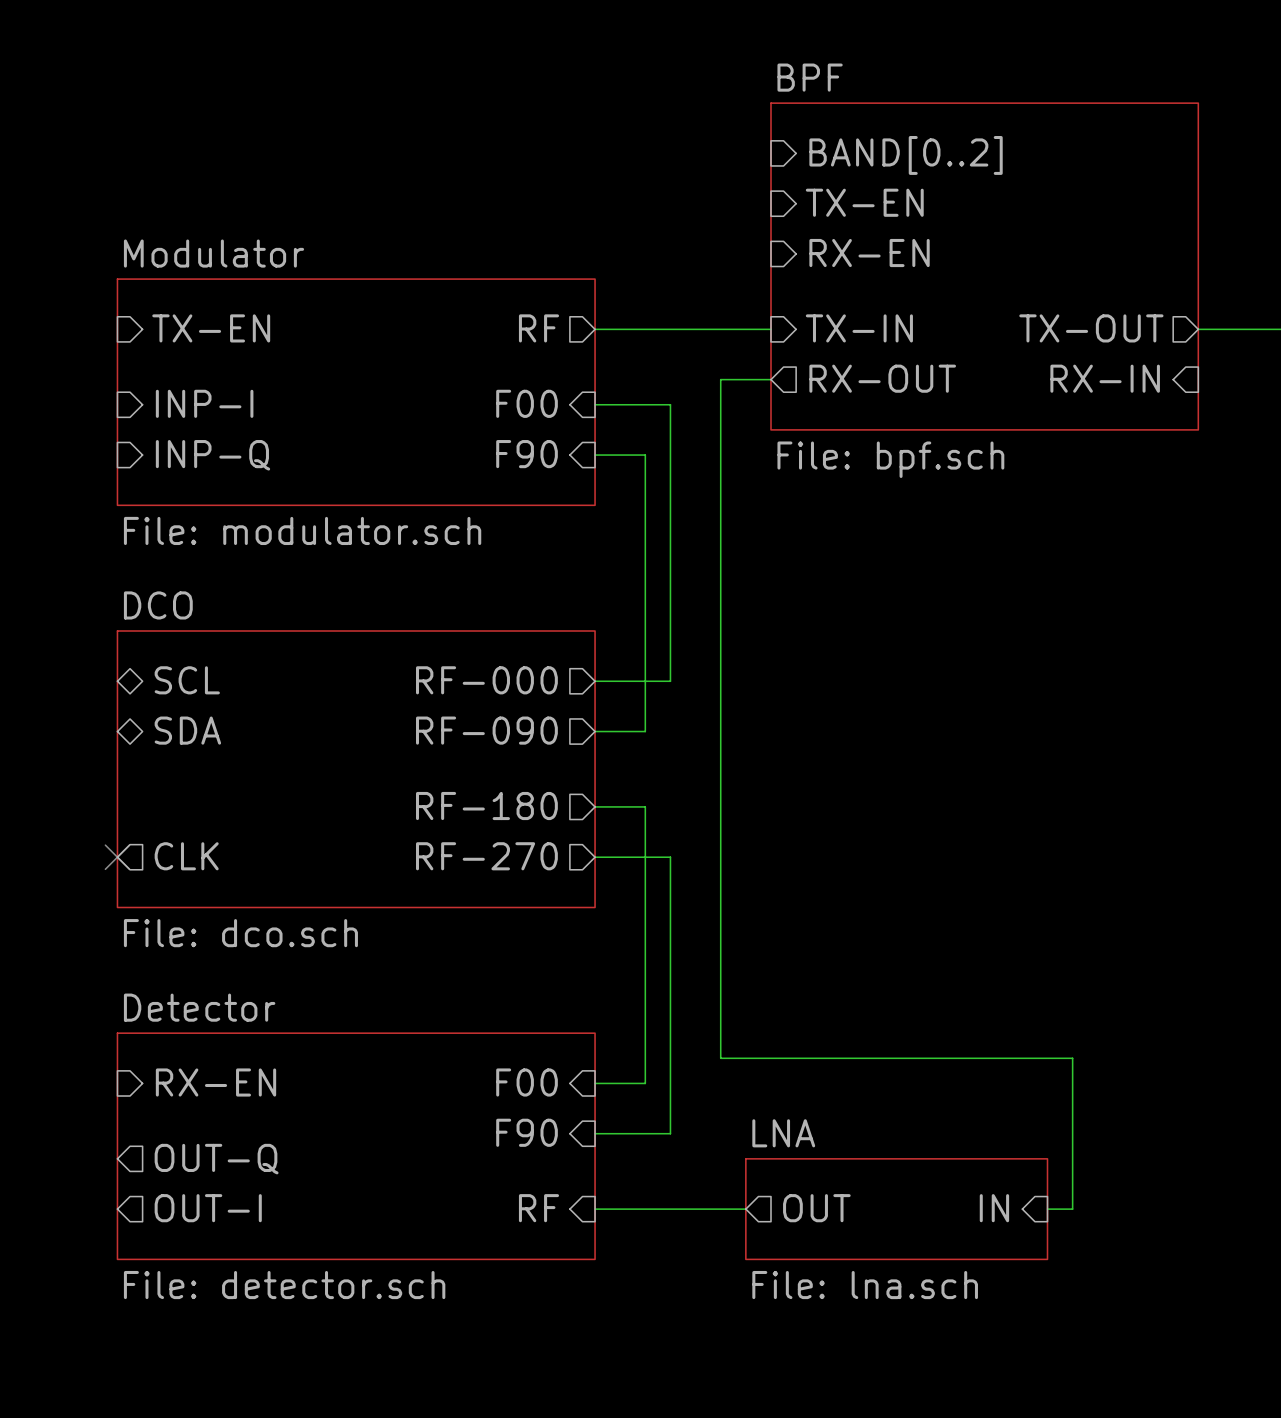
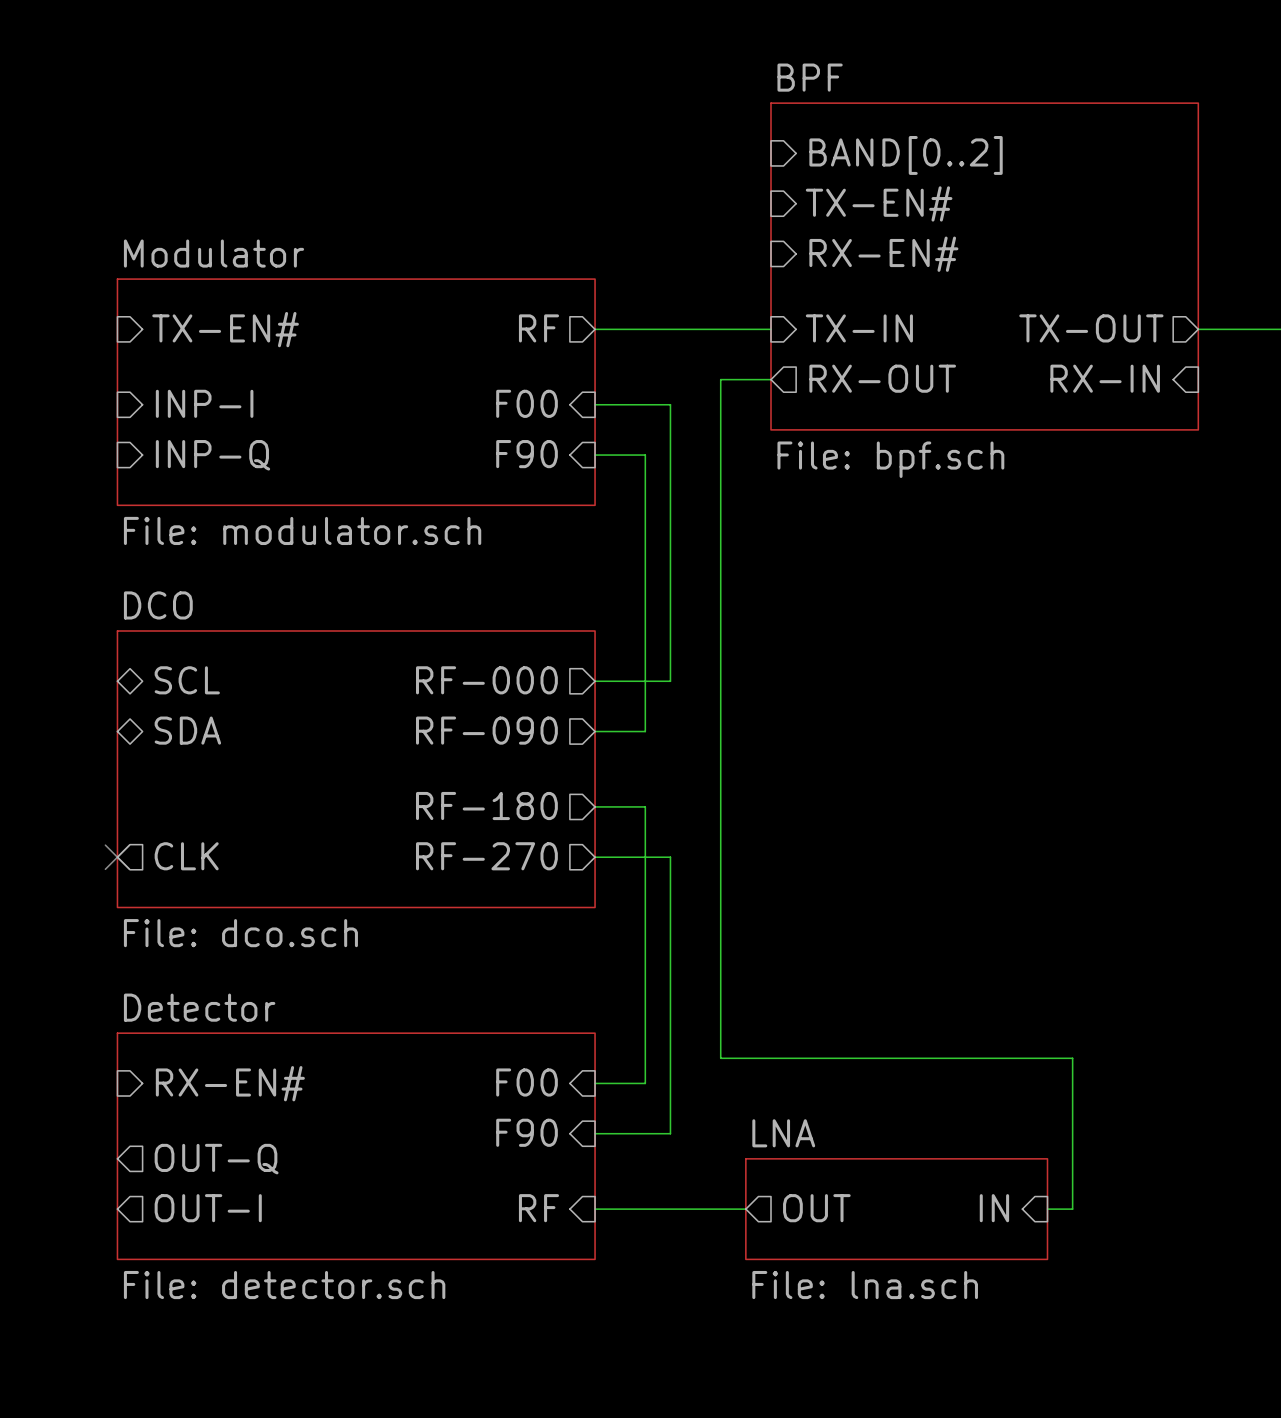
sheet pin: TX-EN (864, 202) -> TX-EN# (879, 203)
sheet pin: RX-EN (869, 253) -> RX-EN# (883, 254)
sheet pin: TX-EN (211, 328) -> TX-EN# (225, 329)
sheet pin: RX-EN (216, 1082) -> RX-EN# (230, 1083)

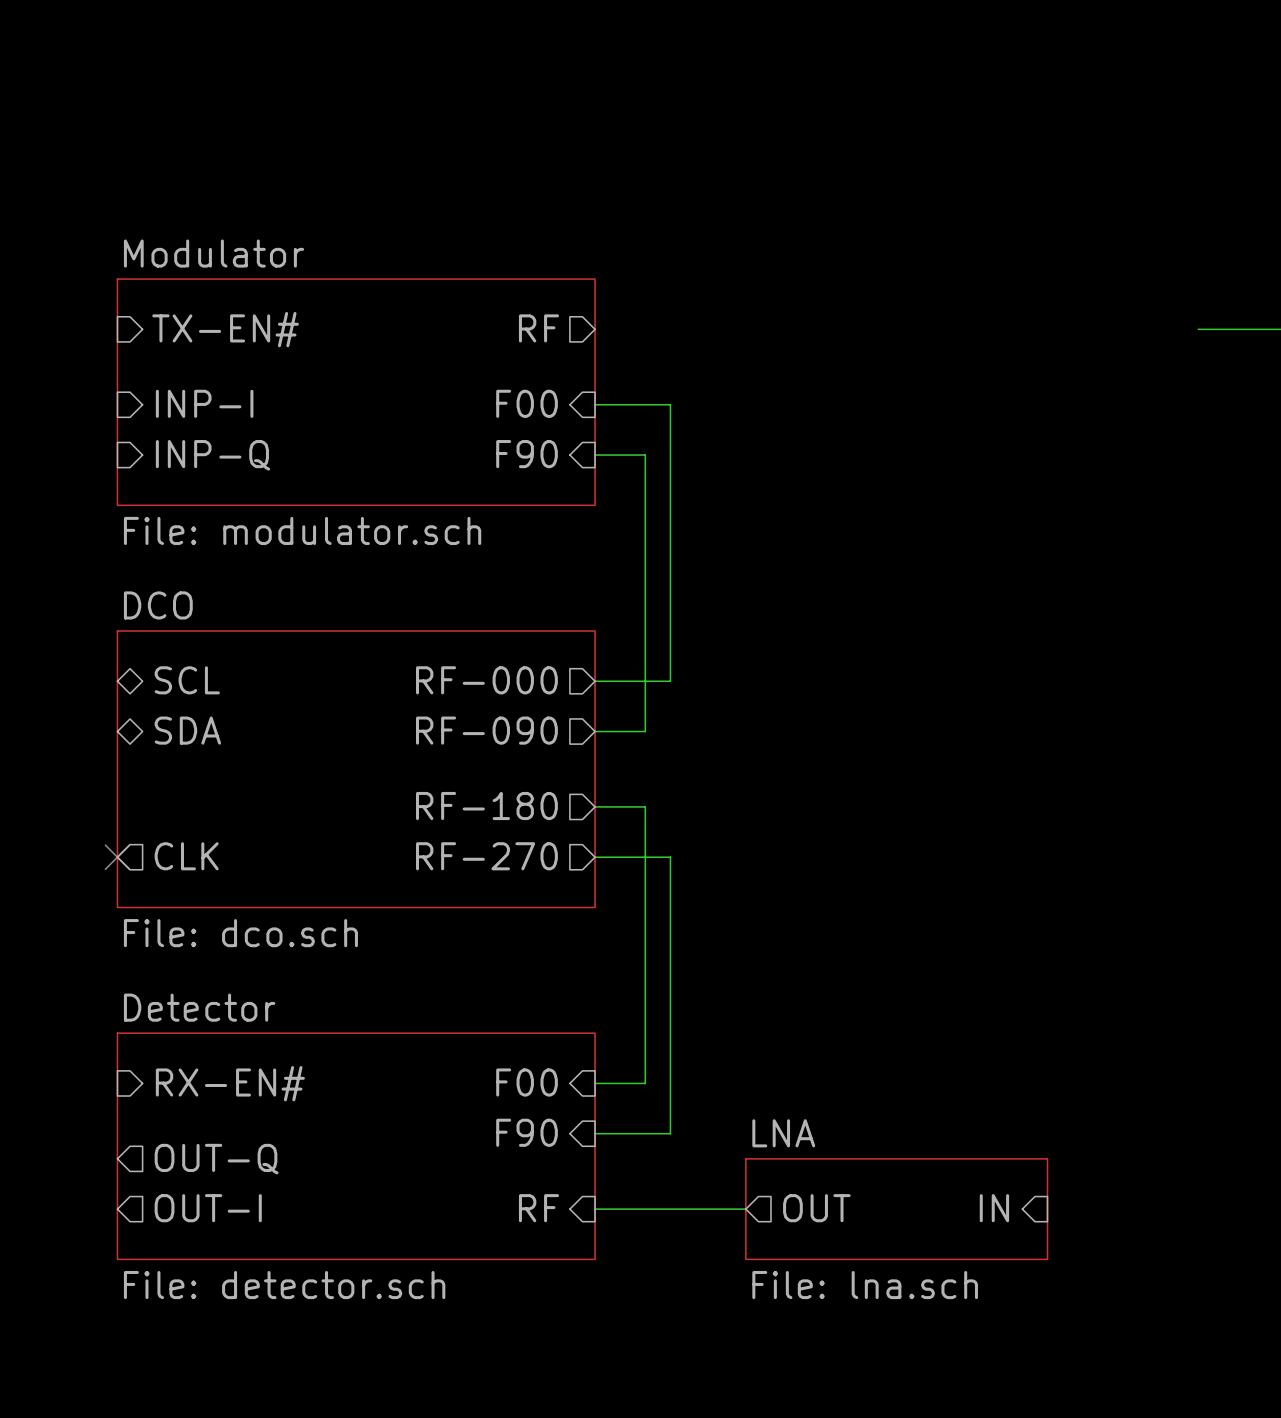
sheet pin: BAND[0..2] (906, 155) -> none
sheet pin: TX-EN# (879, 203) -> none
sheet pin: RX-EN# (883, 254) -> none
sheet BPF: File: bpf.sch (984, 266) -> none
sheet pin: TX-IN (859, 328) -> none
sheet pin: TX-OUT (1091, 328) -> none
wire: (595, 329) (771, 329) -> none
sheet pin: RX-OUT (882, 378) -> none
sheet pin: RX-IN (1105, 378) -> none
wire: (771, 379) (720, 379) (720, 1058) (1072, 1058) (1072, 1209) (1047, 1209) -> none

